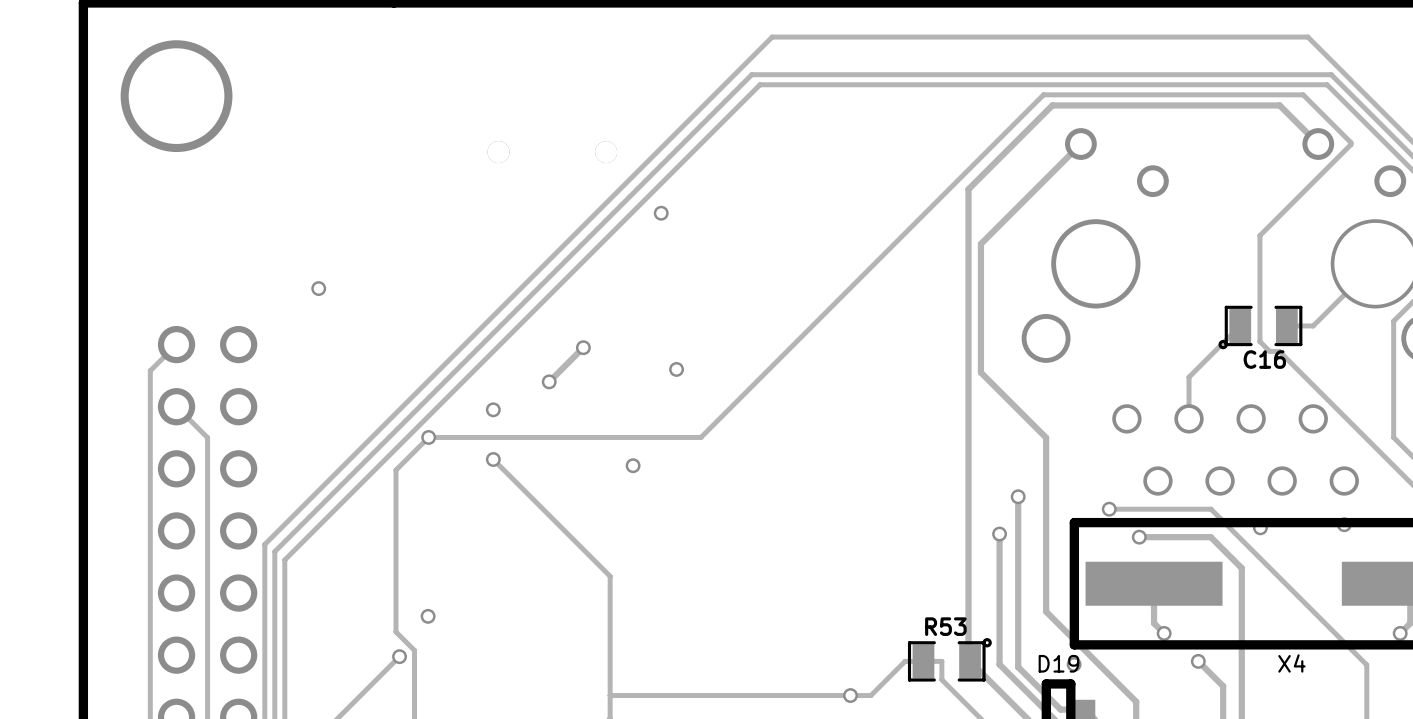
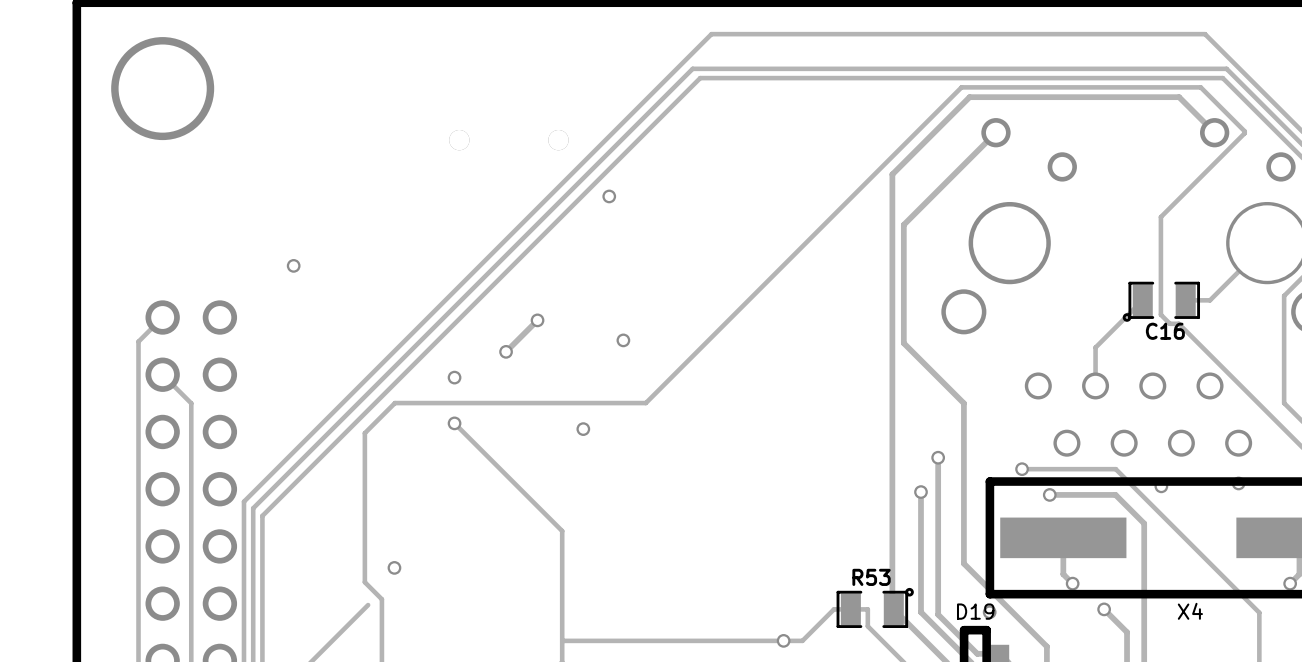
via: (428, 437) -> none
via: (399, 656) -> none

